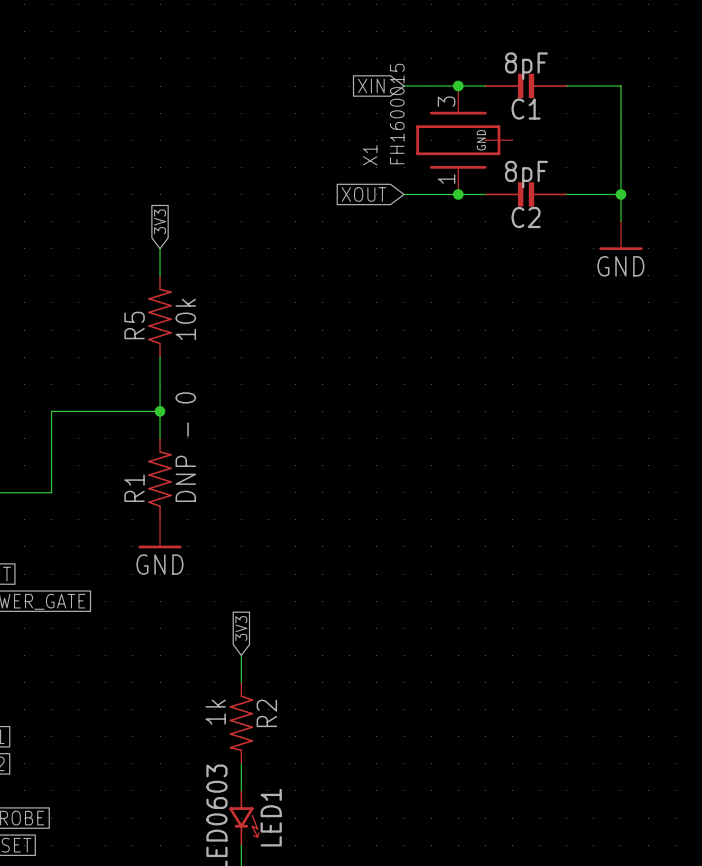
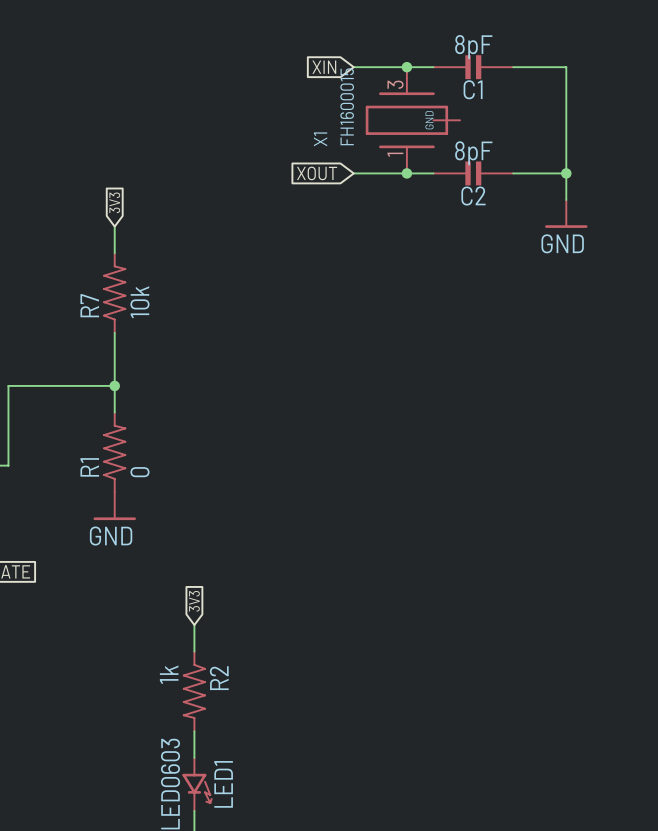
R5 name: R5 (134, 325) -> R7 (89, 305)
R1 value: DNP - 0 (185, 447) -> 0 (139, 472)

